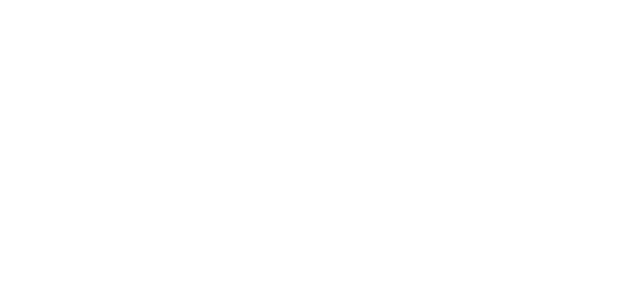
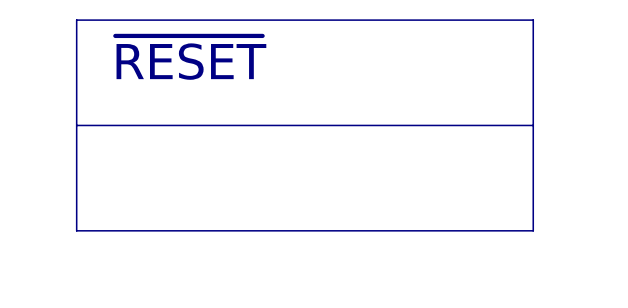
line: none -> (76, 20) (533, 20) (533, 230) (76, 230) (76, 20)
text: none -> ~{RESET} (190, 57)
line: none -> (76, 125) (533, 125)

